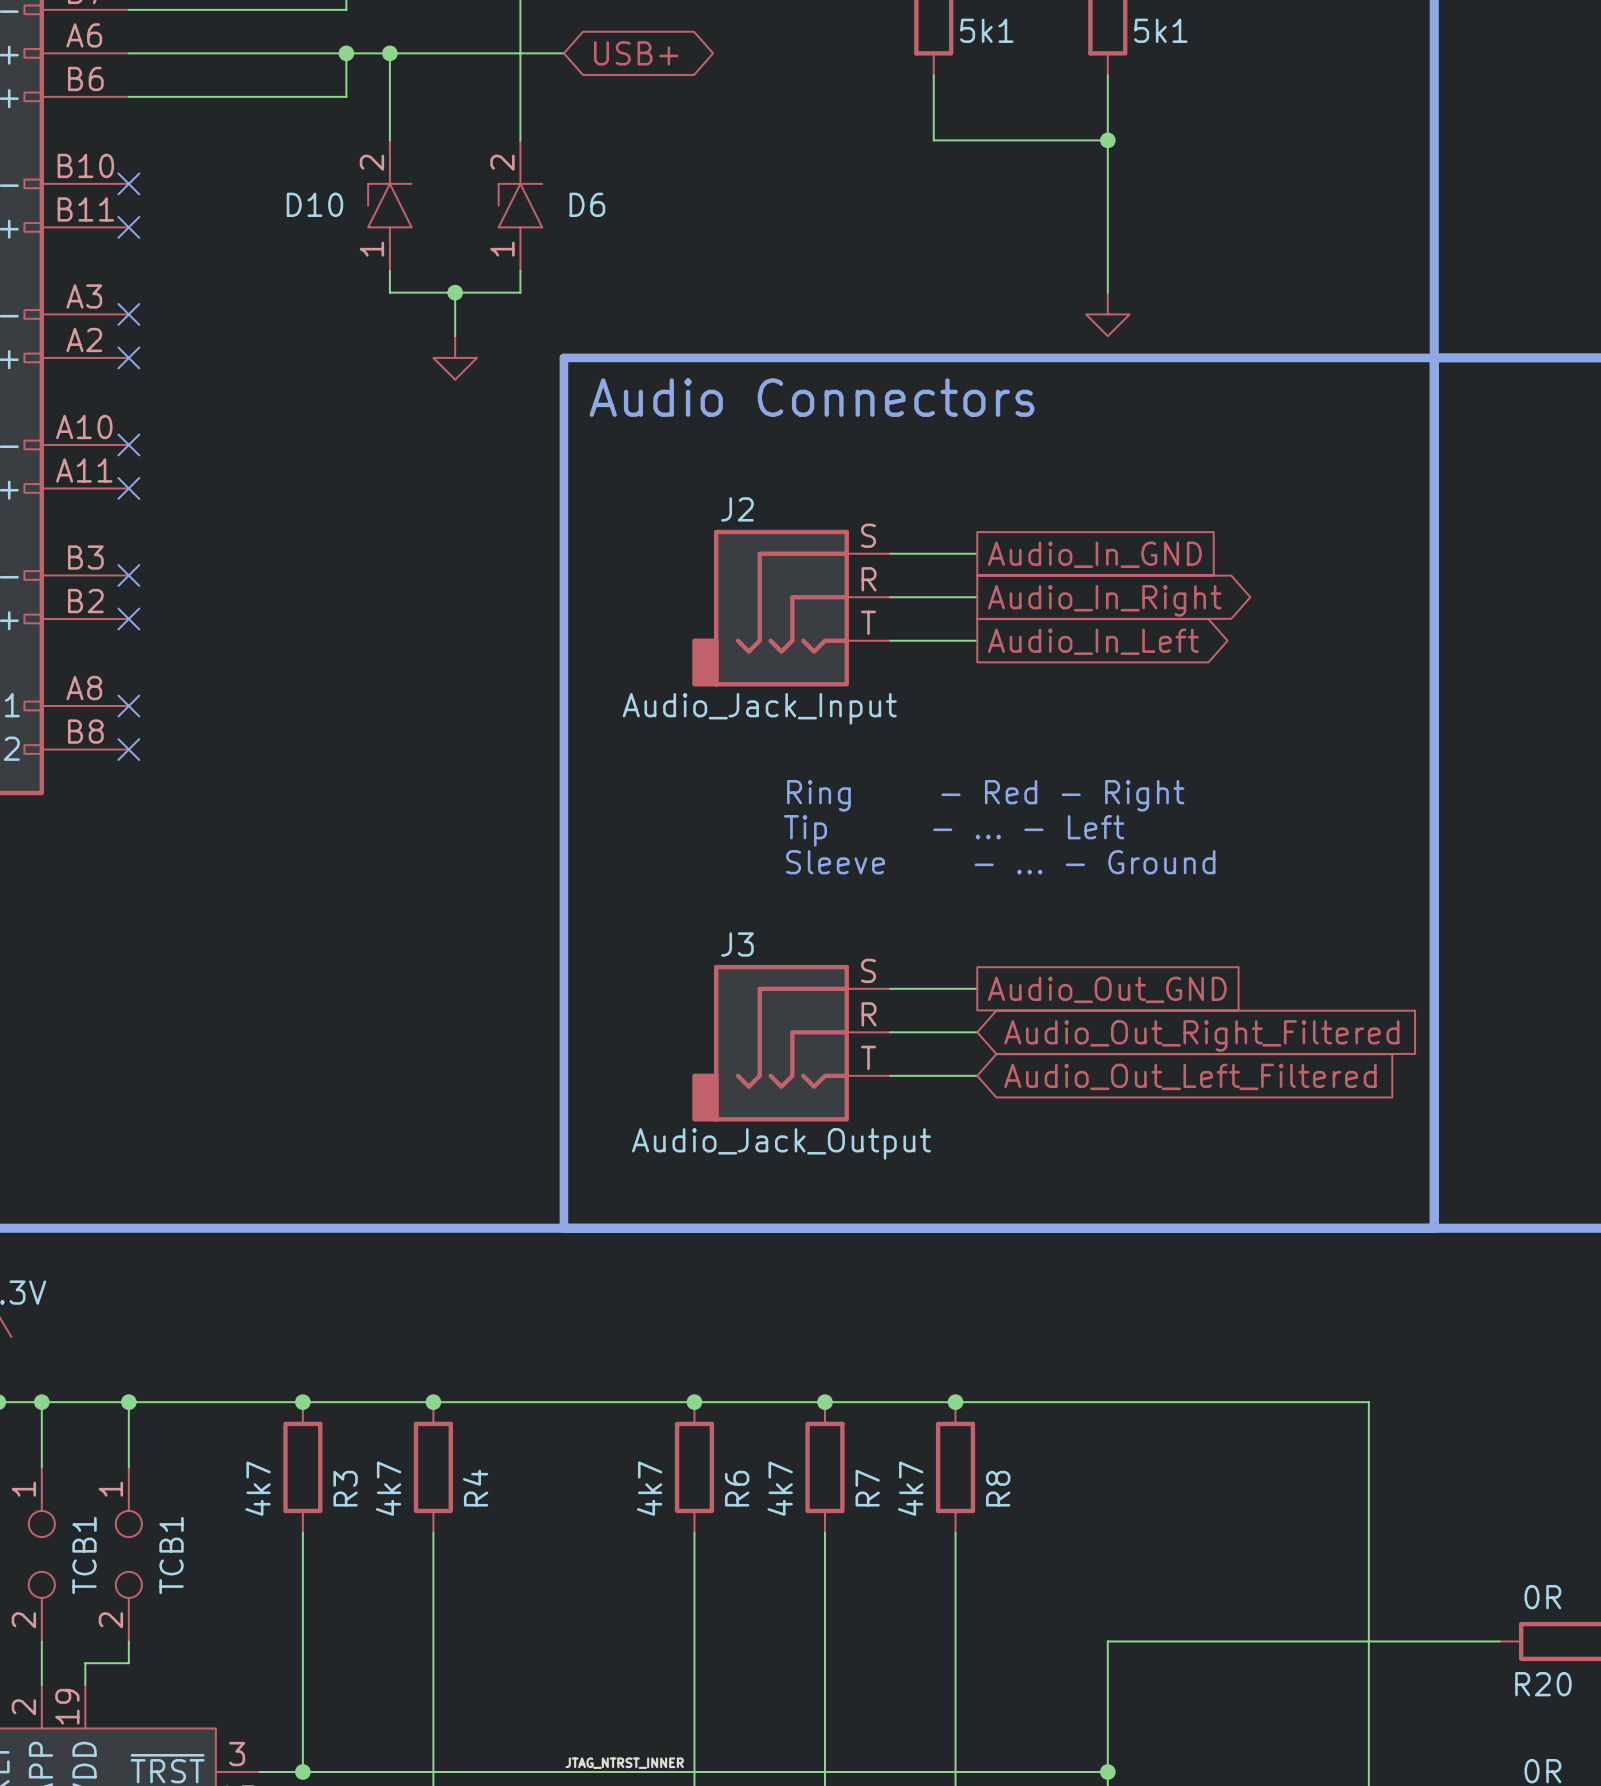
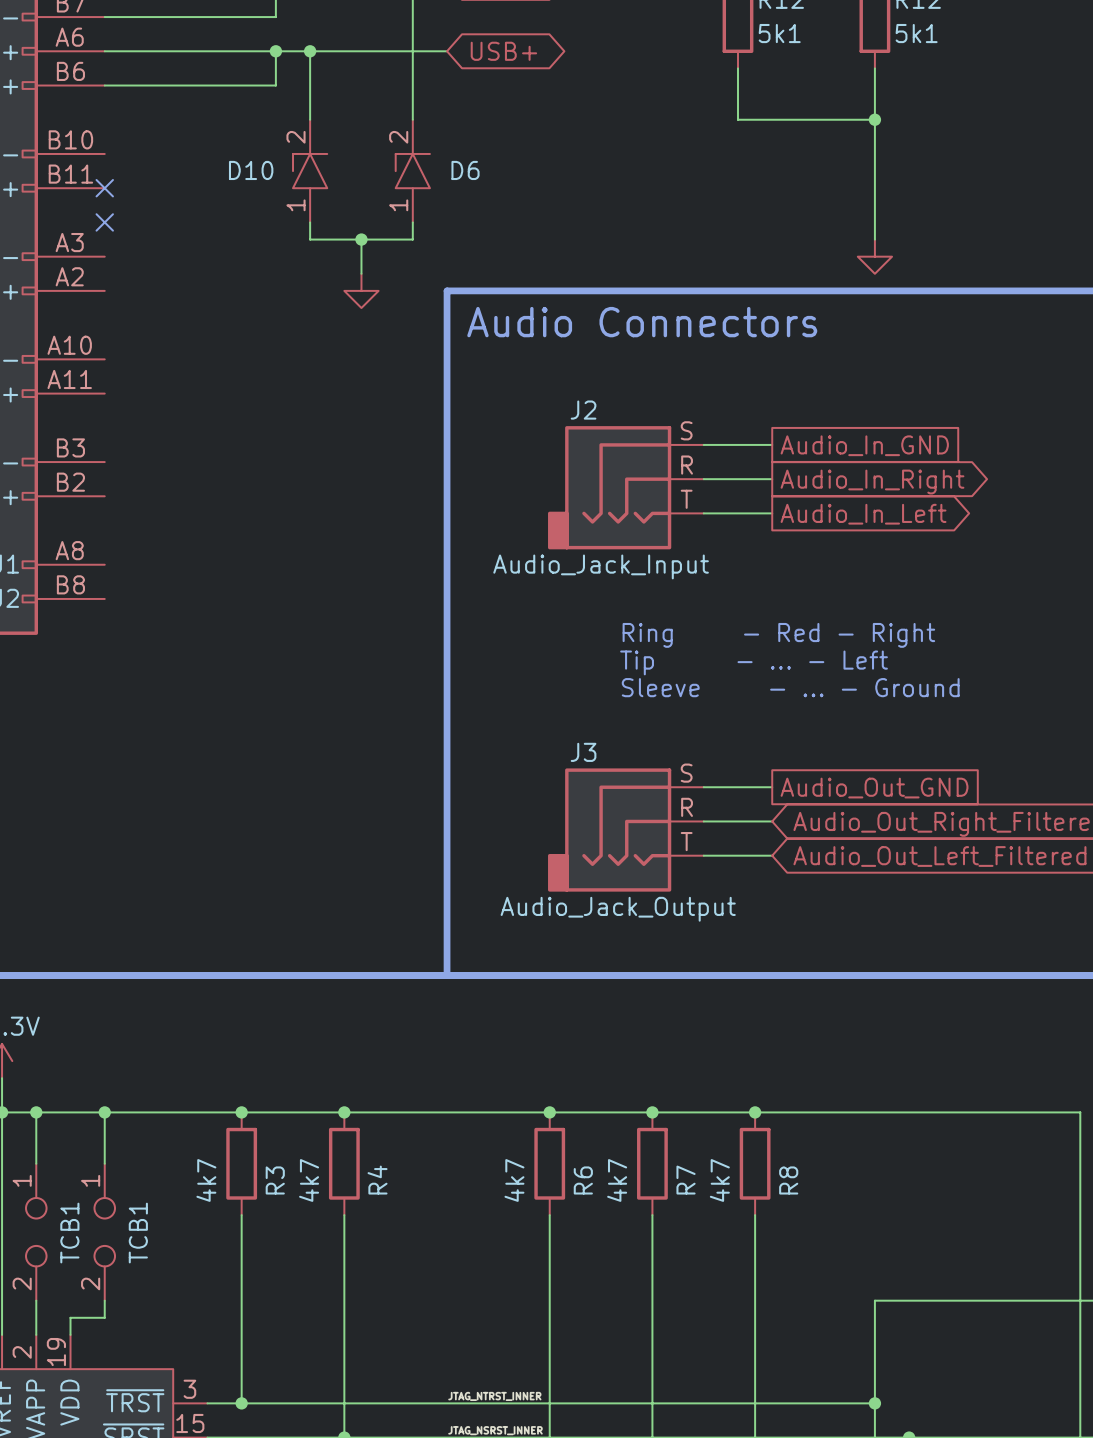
no-connect mark: (128, 183) -> none
no-connect mark: none -> (104, 222)
no-connect mark: (128, 314) -> none
no-connect mark: (128, 357) -> none
no-connect mark: (128, 444) -> none
no-connect mark: (128, 488) -> none
no-connect mark: (128, 575) -> none
no-connect mark: (128, 618) -> none
no-connect mark: (128, 706) -> none
no-connect mark: (128, 749) -> none

